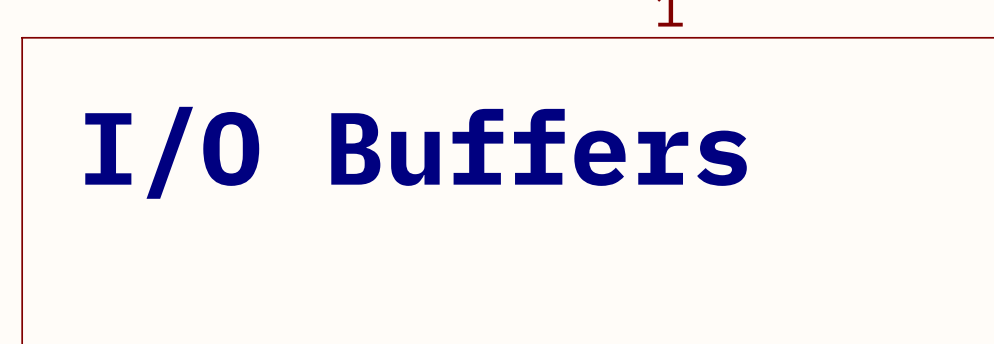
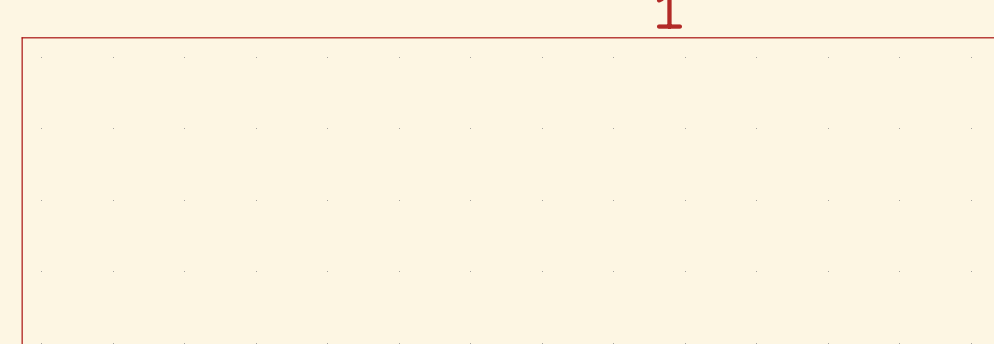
text: I/O Buffers (416, 152) -> none

